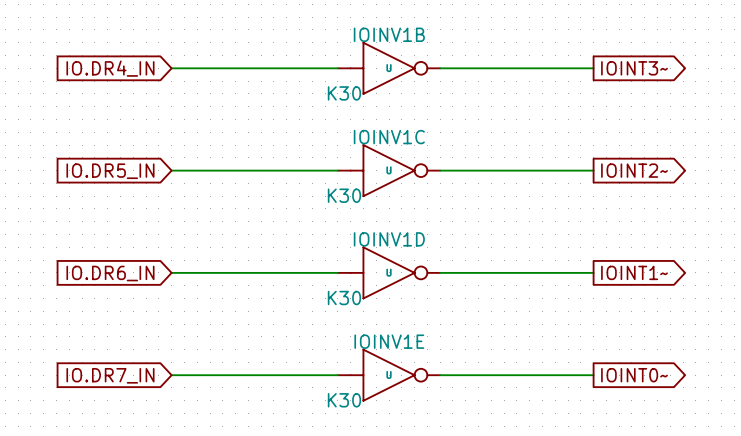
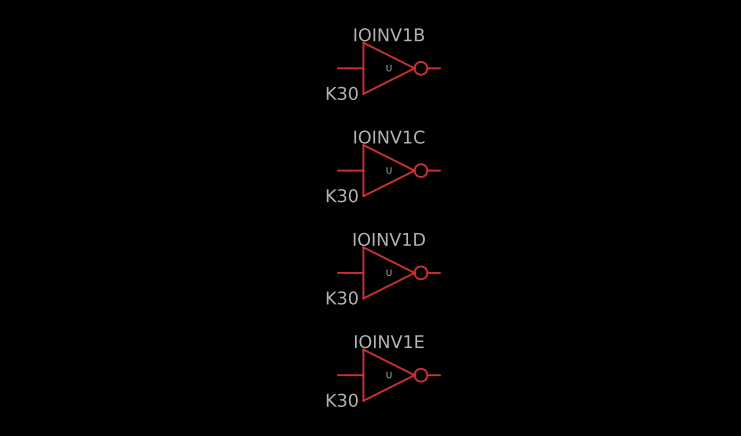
global label: IO.DR4_IN (110, 68) -> none
wire: (171, 68) (337, 68) -> none
wire: (440, 68) (593, 68) -> none
global label: IOINT3~ (634, 68) -> none
wire: (171, 170) (337, 170) -> none
wire: (440, 170) (593, 170) -> none
global label: IOINT2~ (634, 170) -> none
global label: IO.DR5_IN (110, 171) -> none
wire: (171, 272) (337, 272) -> none
wire: (440, 272) (593, 272) -> none
global label: IOINT1~ (634, 272) -> none
global label: IO.DR6_IN (110, 273) -> none
global label: IO.DR7_IN (110, 375) -> none
wire: (171, 375) (337, 375) -> none
wire: (440, 375) (593, 375) -> none
global label: IOINT0~ (634, 375) -> none

